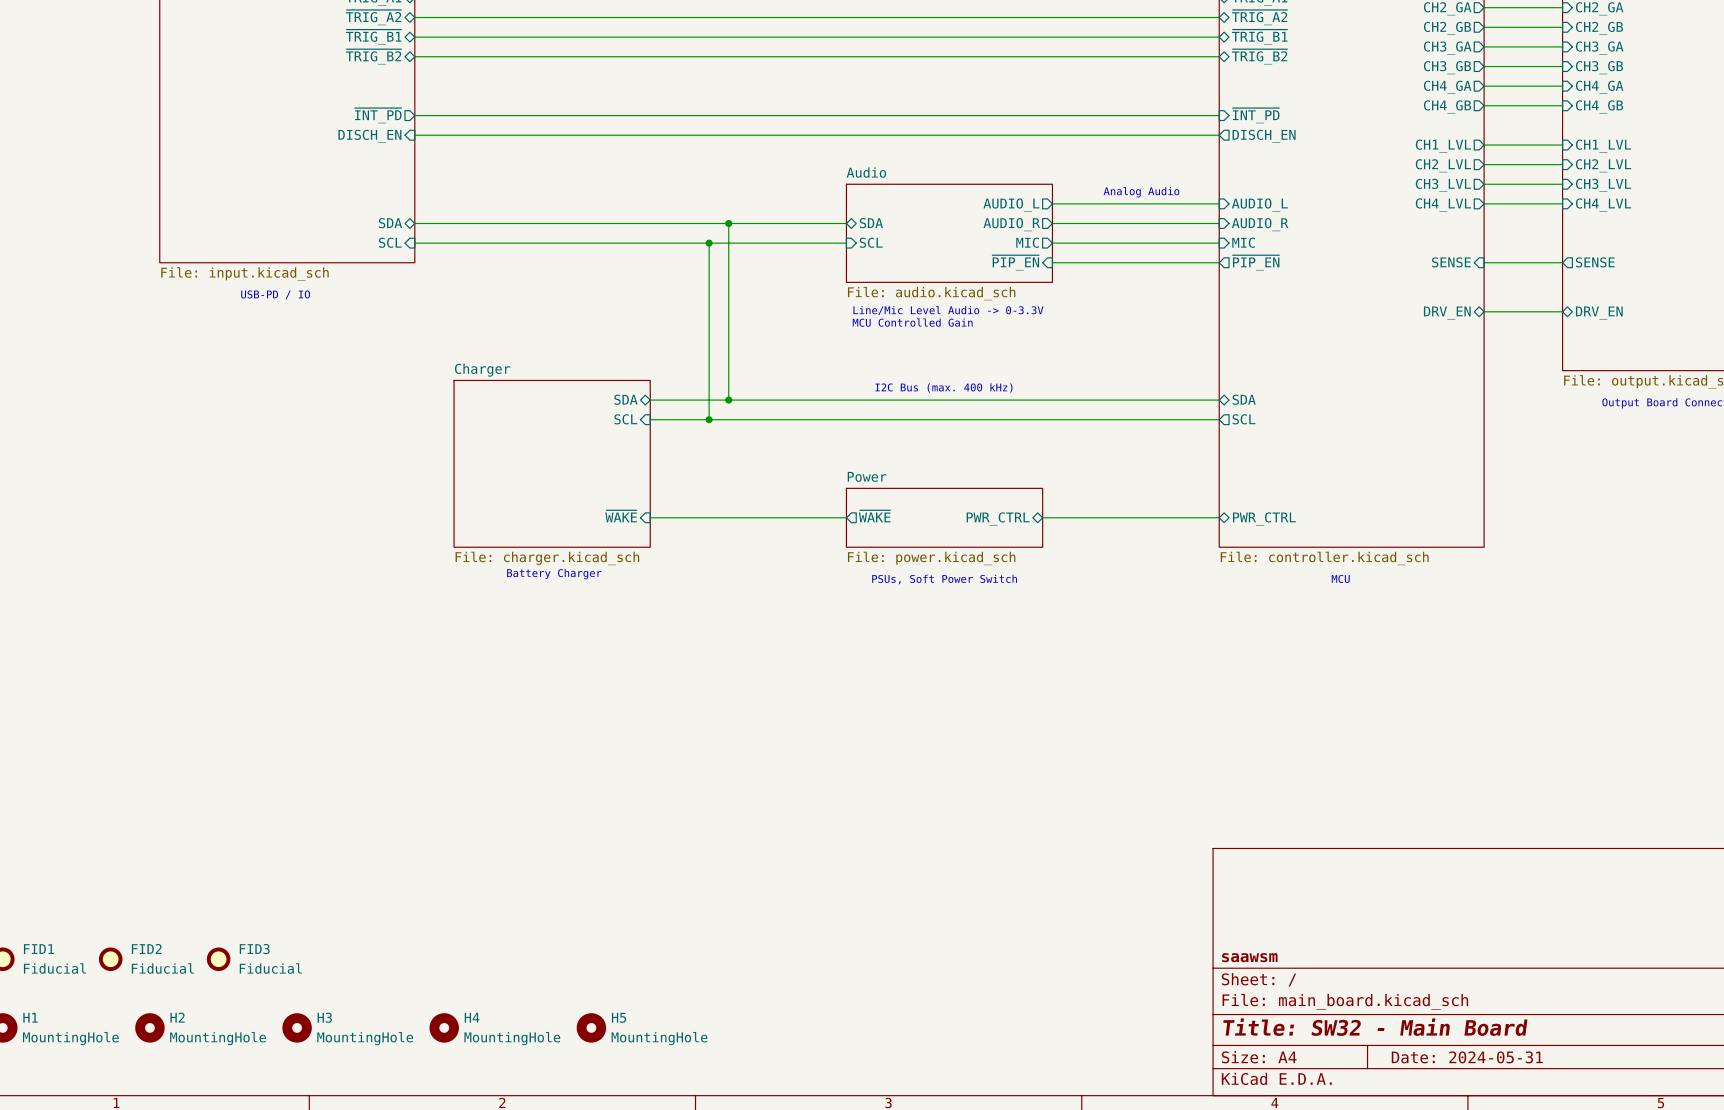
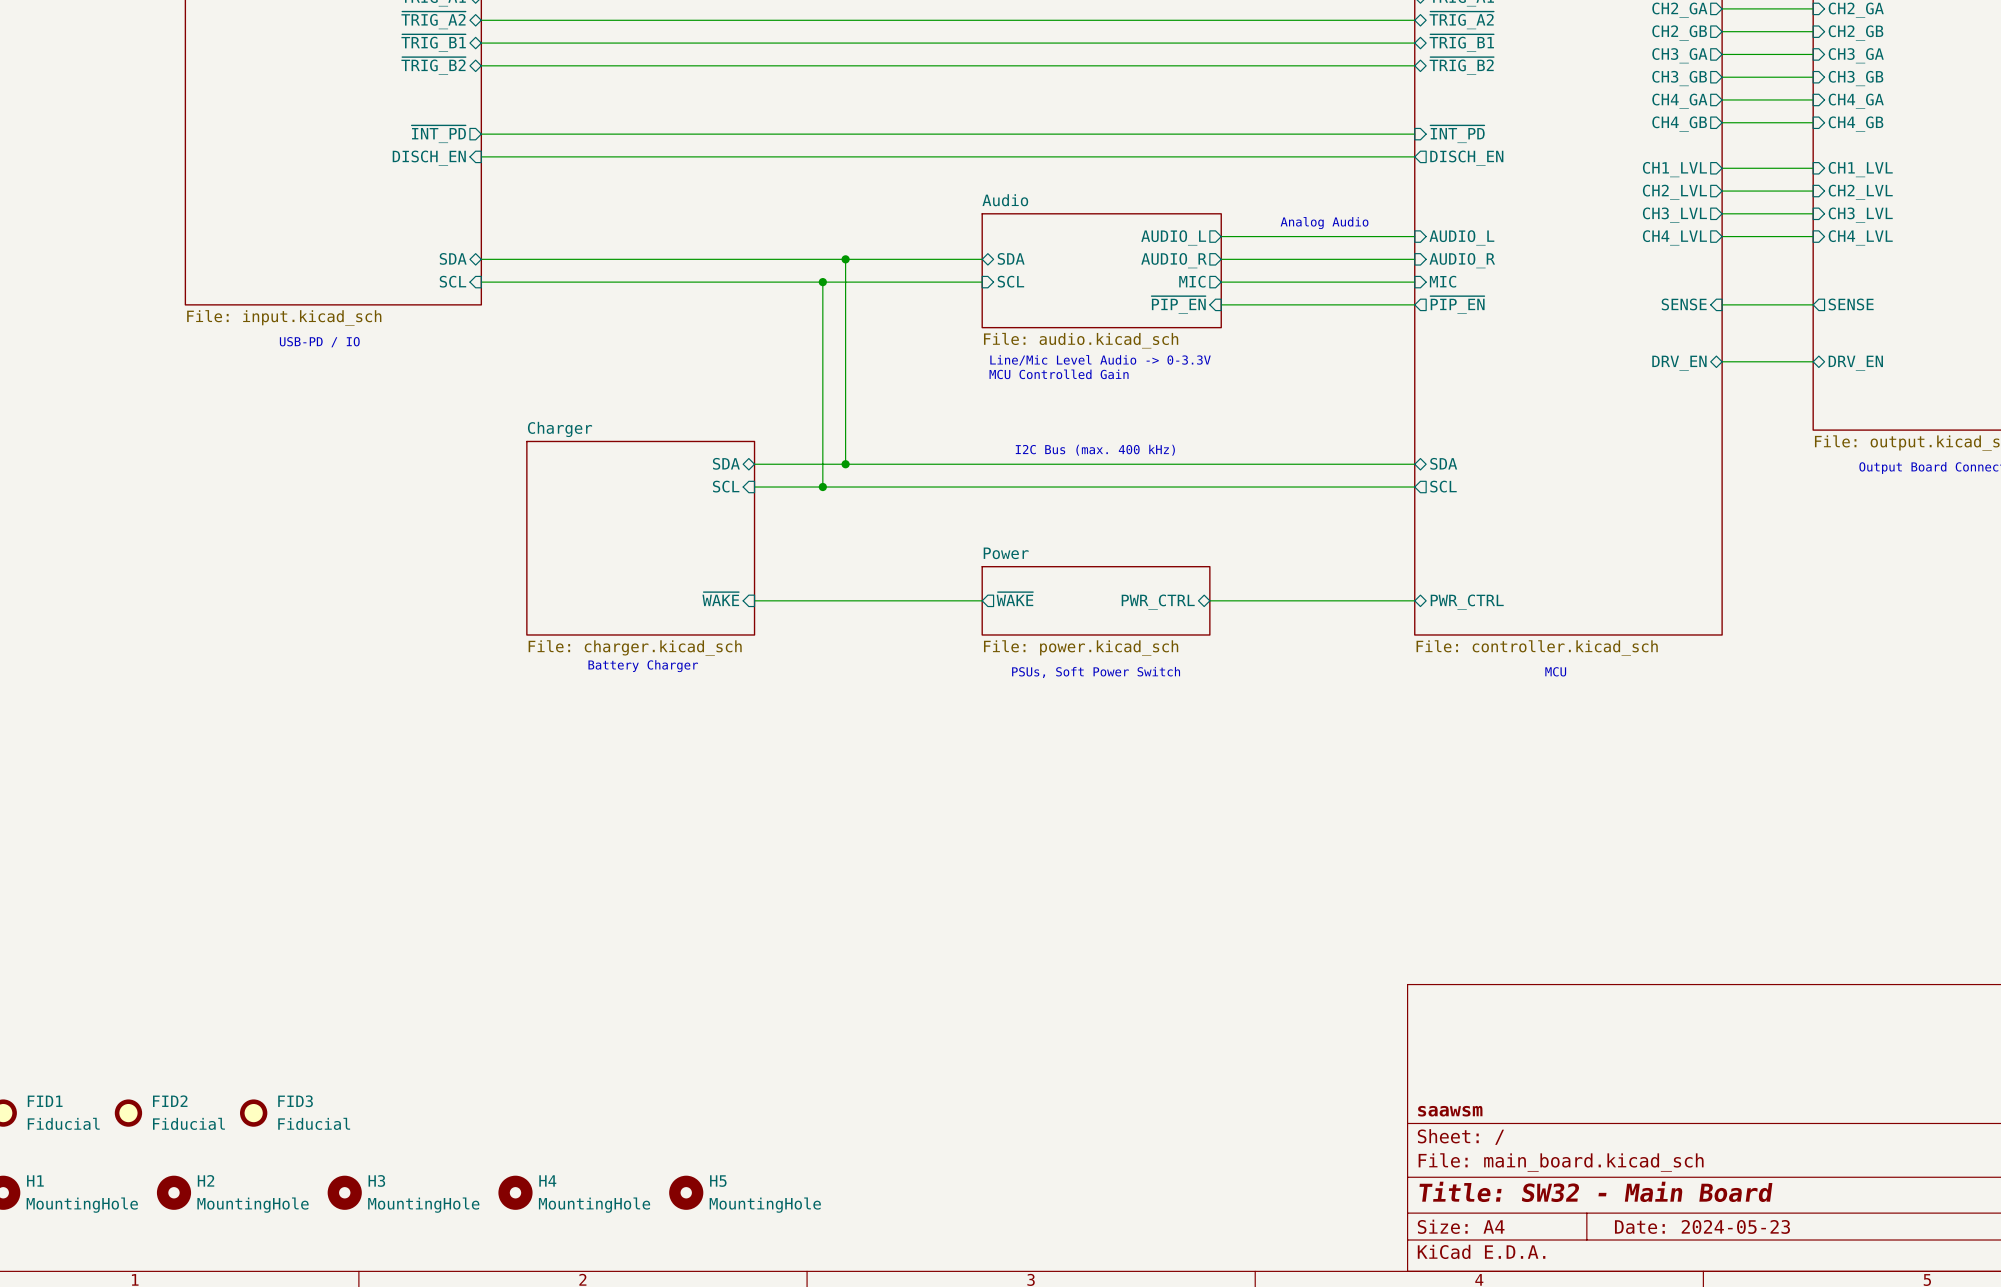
title block: Date: 2024-05-31 (1467, 1057) -> Date: 2024-05-23 (1702, 1226)

